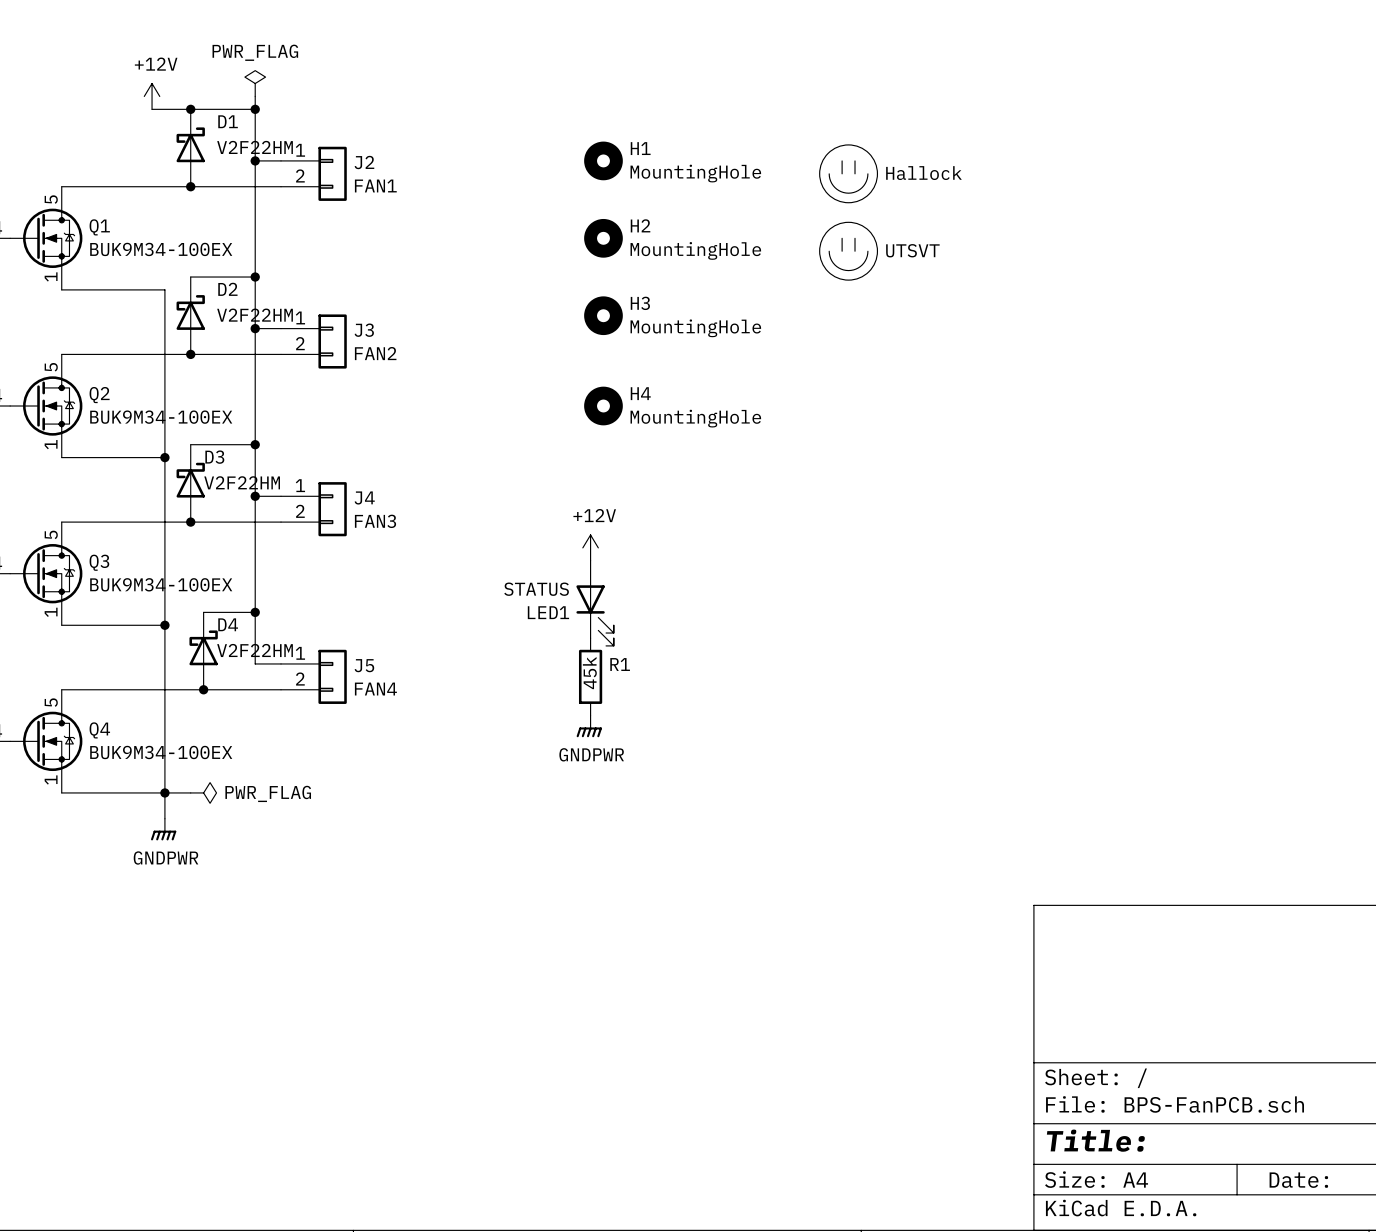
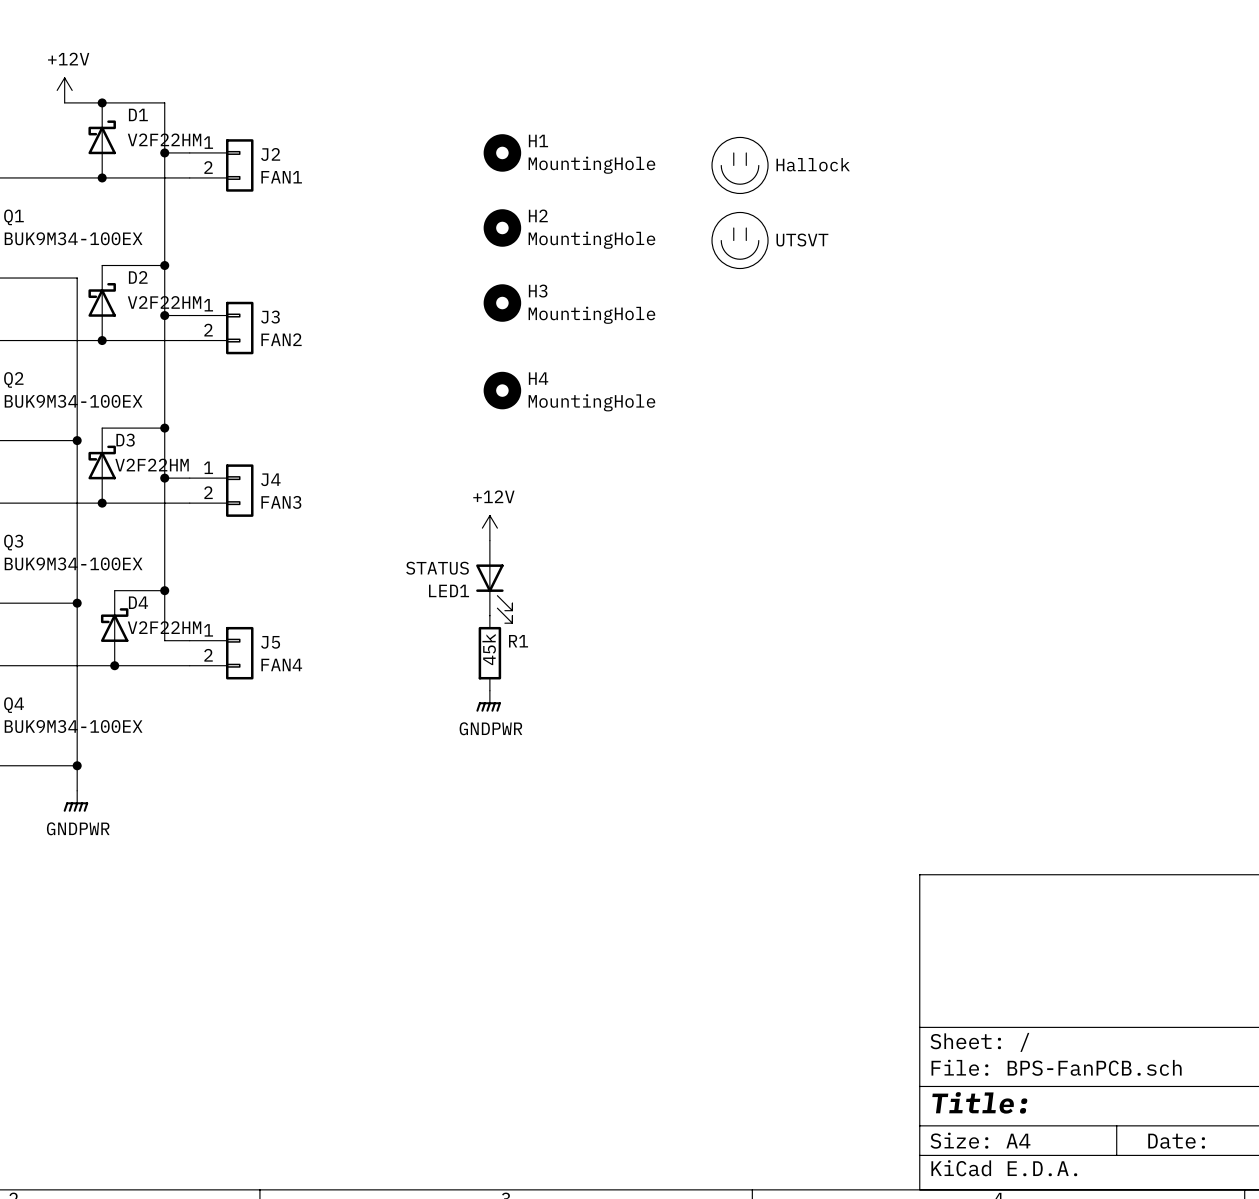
power symbol: PWR_FLAG (255, 83) -> none
wire: (255, 96) (255, 109) -> none
junction: (255, 109) -> none
wire: (164, 792) (190, 792) -> none
power symbol: PWR_FLAG (203, 792) -> none

